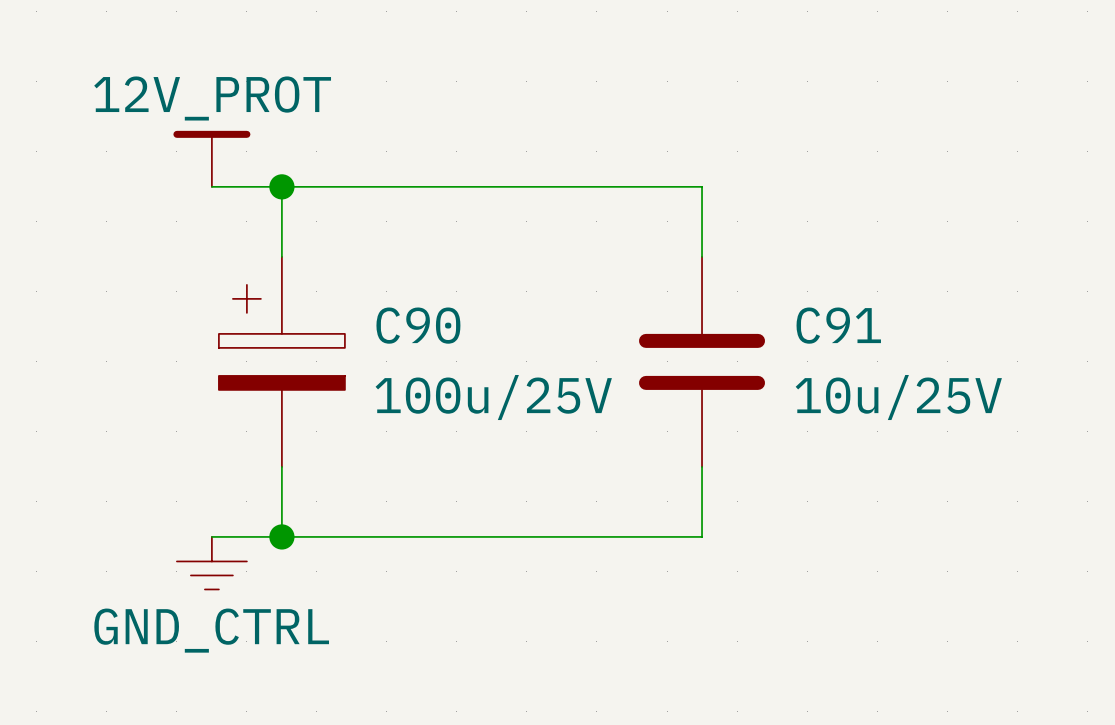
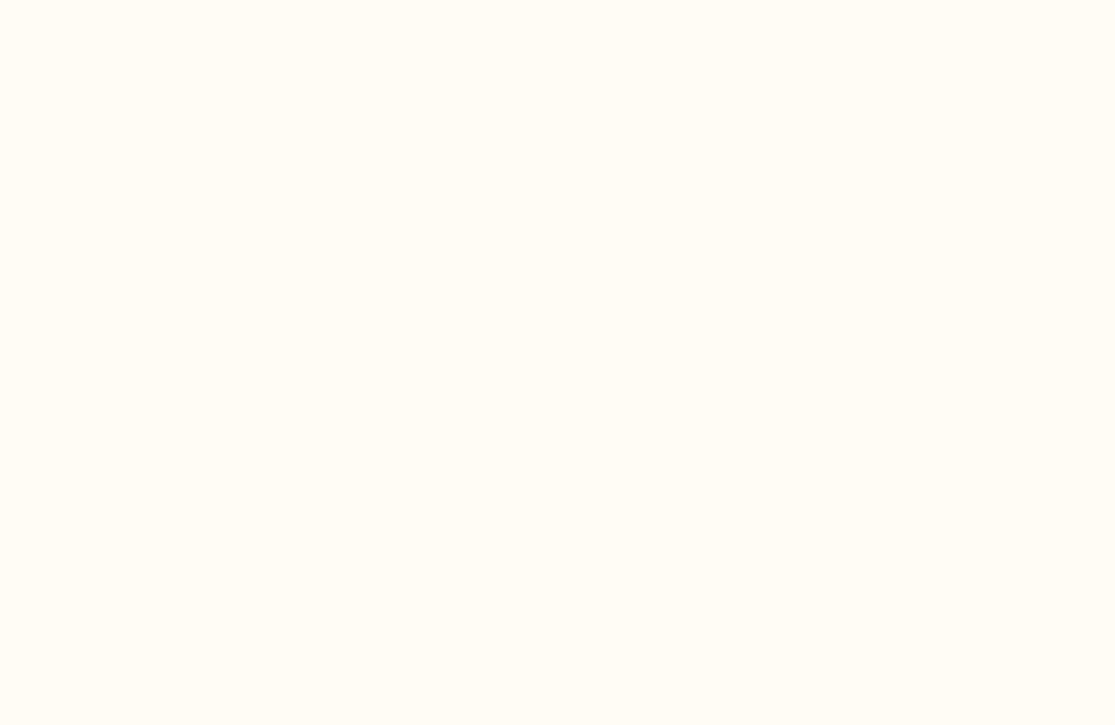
power symbol: 12V_PROT (211, 158) -> none
wire: (211, 186) (702, 186) (702, 256) -> none
wire: (281, 186) (281, 256) -> none
junction: (281, 186) -> none
C90: 100u/25V (281, 361) -> none
C91: 10u/25V (702, 361) -> none
wire: (281, 466) (281, 536) -> none
wire: (702, 466) (702, 536) (211, 536) -> none
junction: (281, 536) -> none
power symbol: GND_CTRL (211, 563) -> none

